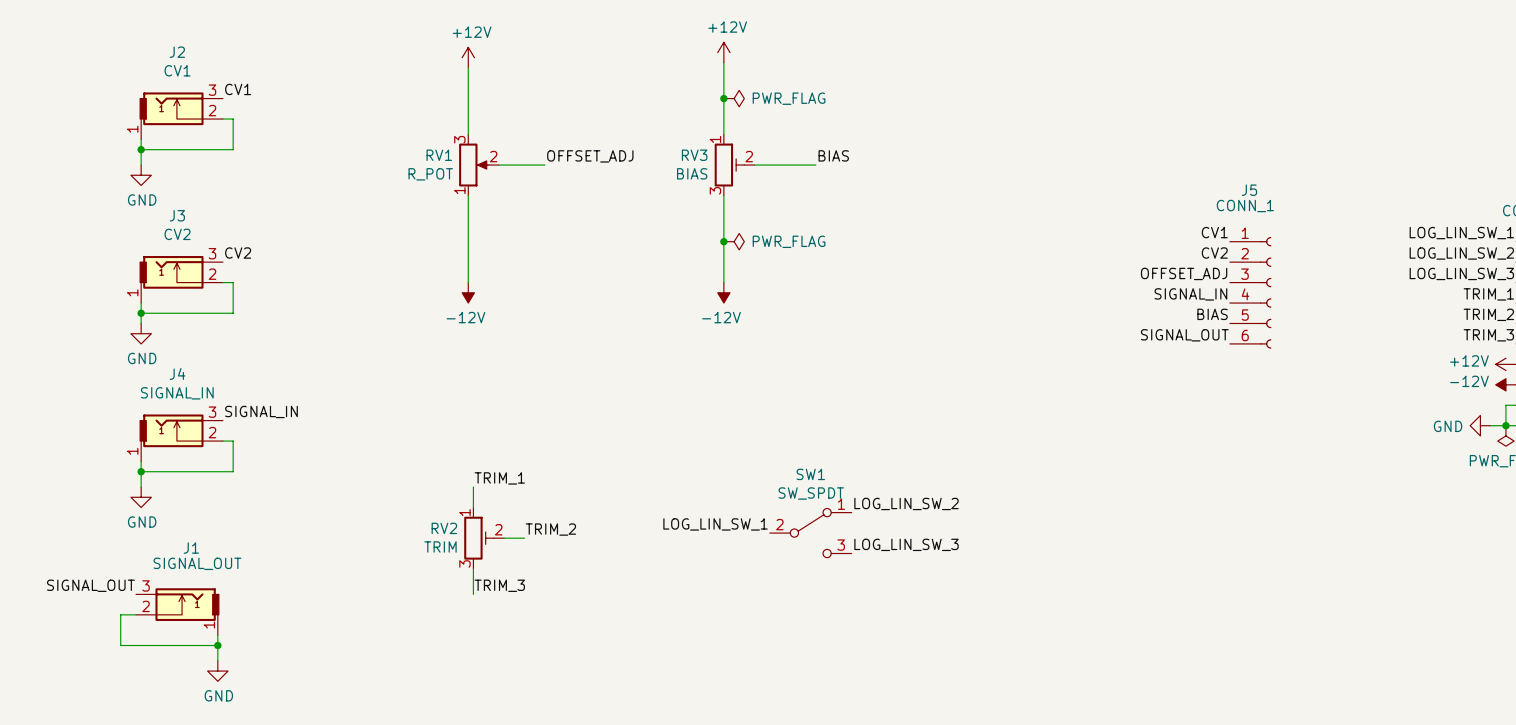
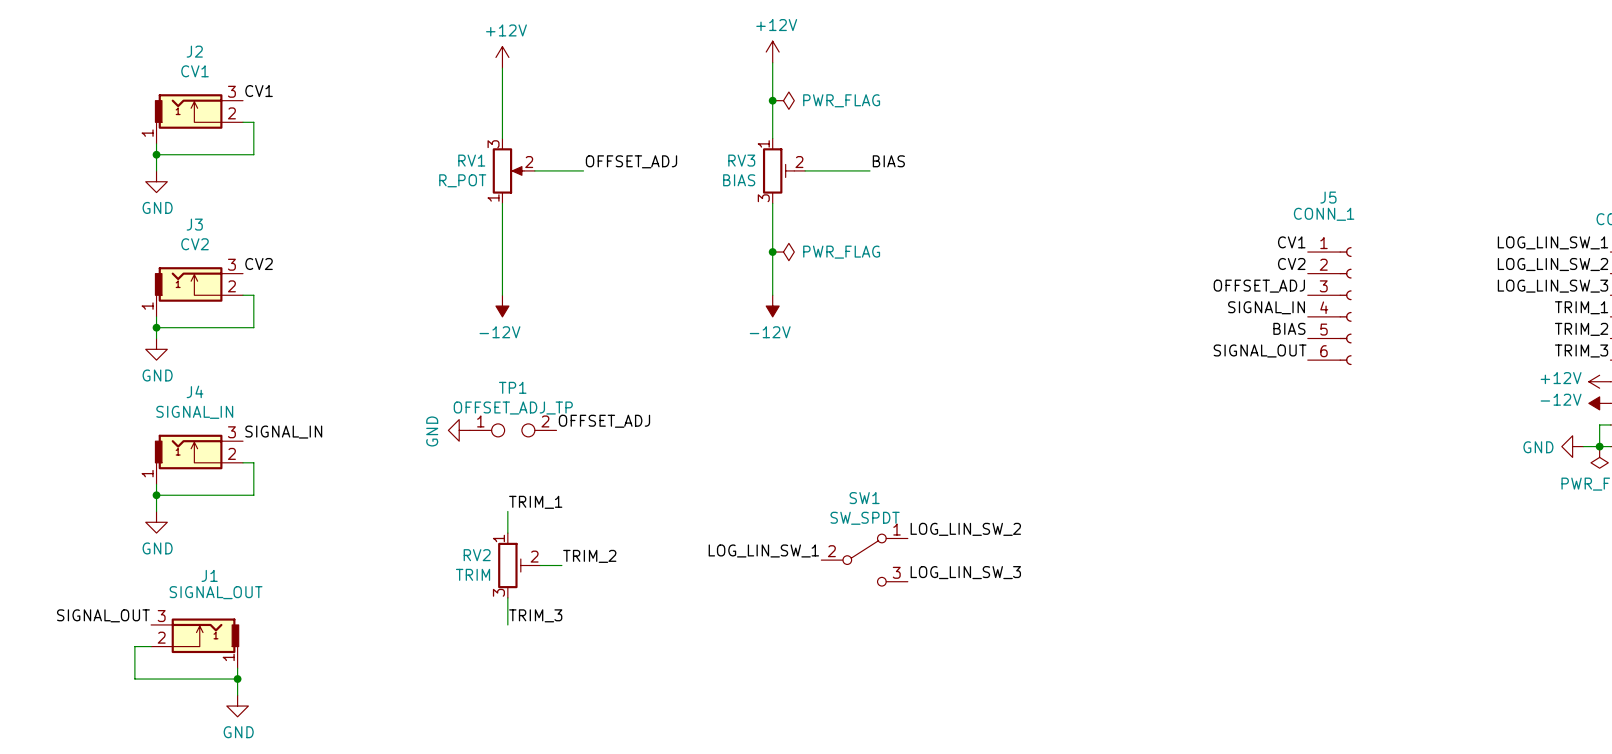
label: none -> OFFSET_ADJ (604, 421)
power symbol: none -> GND (459, 430)
TP1: none -> OFFSET_ADJ_TP (513, 430)

